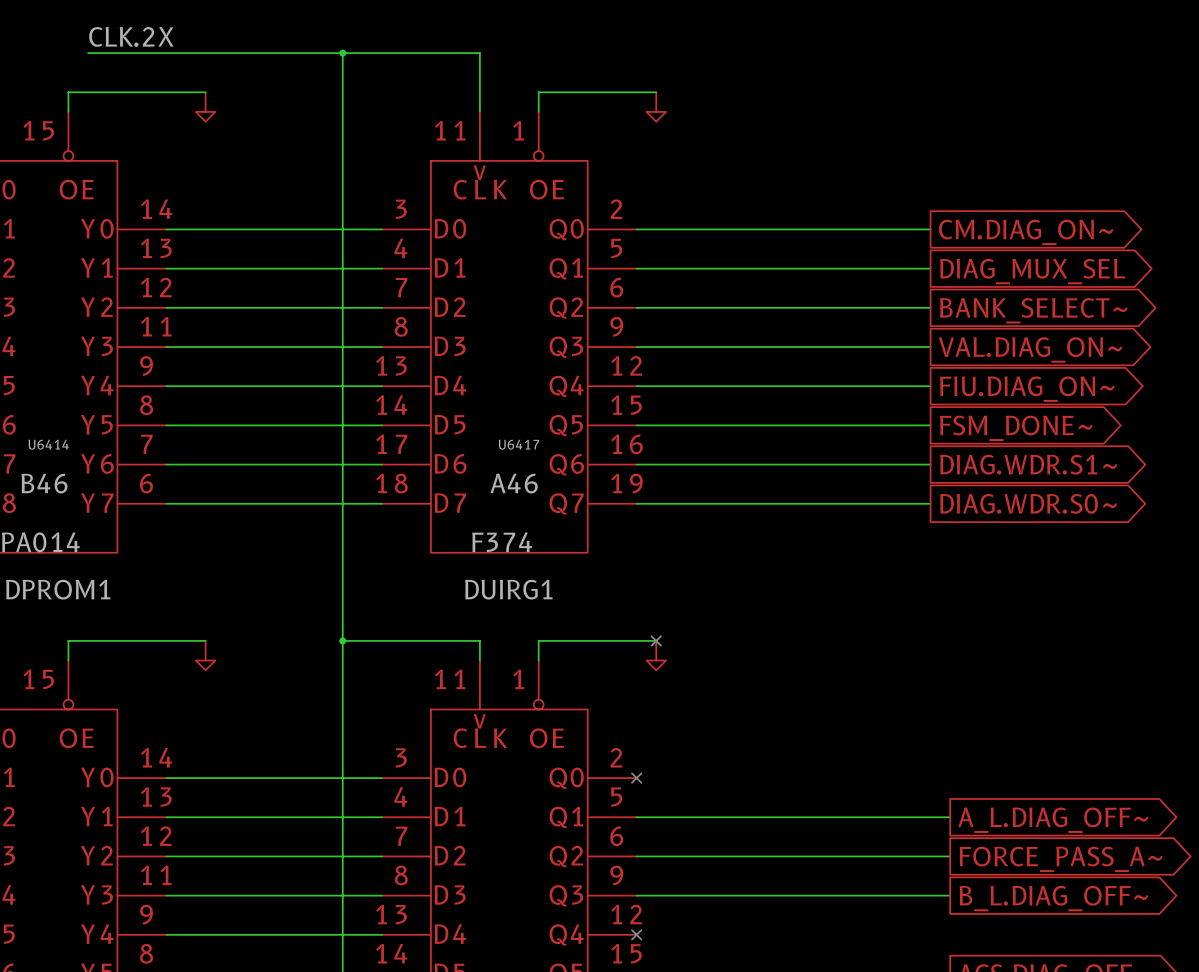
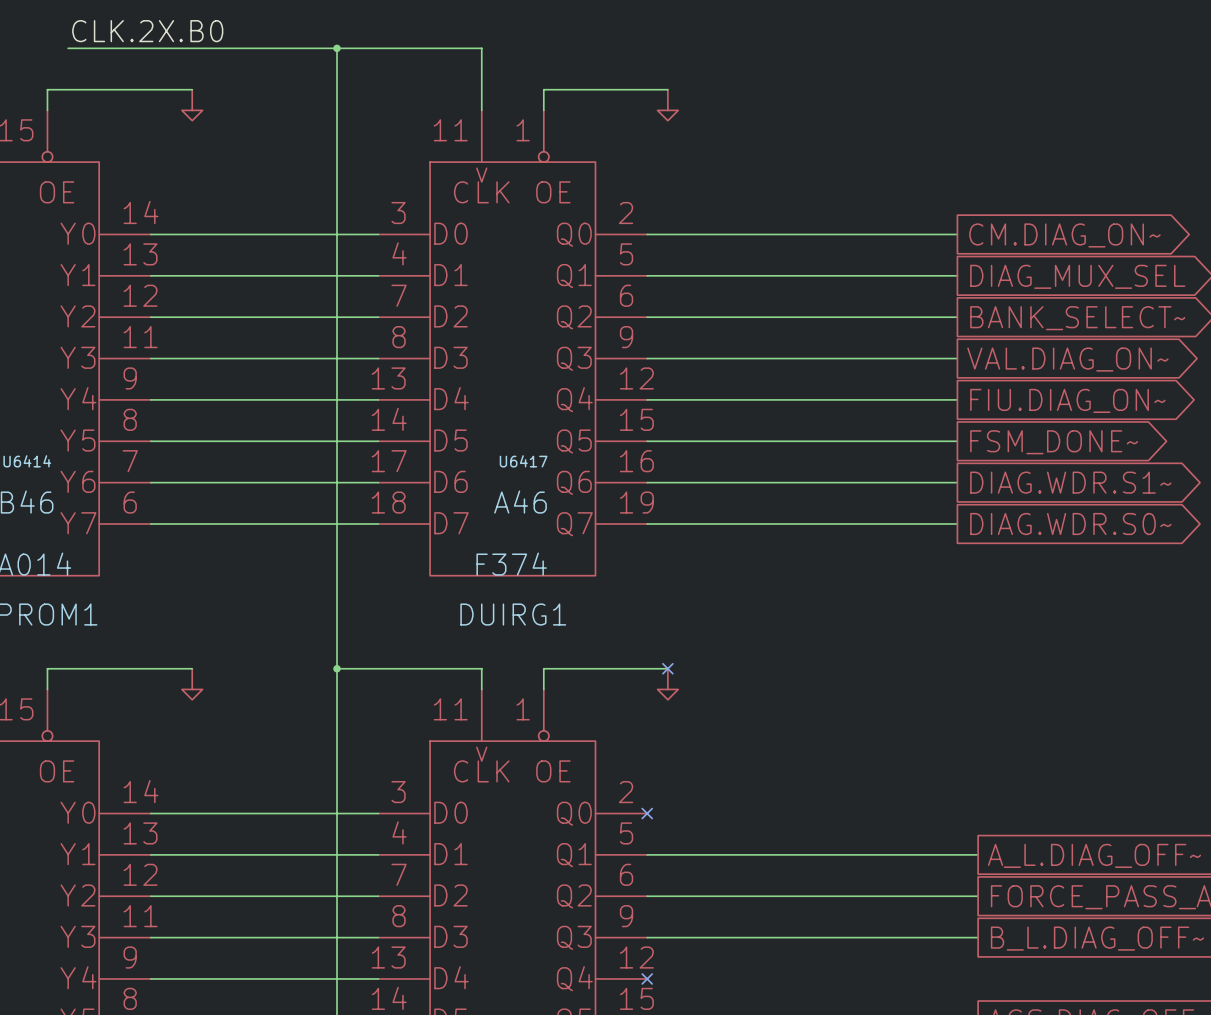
label: CLK.2X (131, 36) -> CLK.2X.B0 (147, 31)

